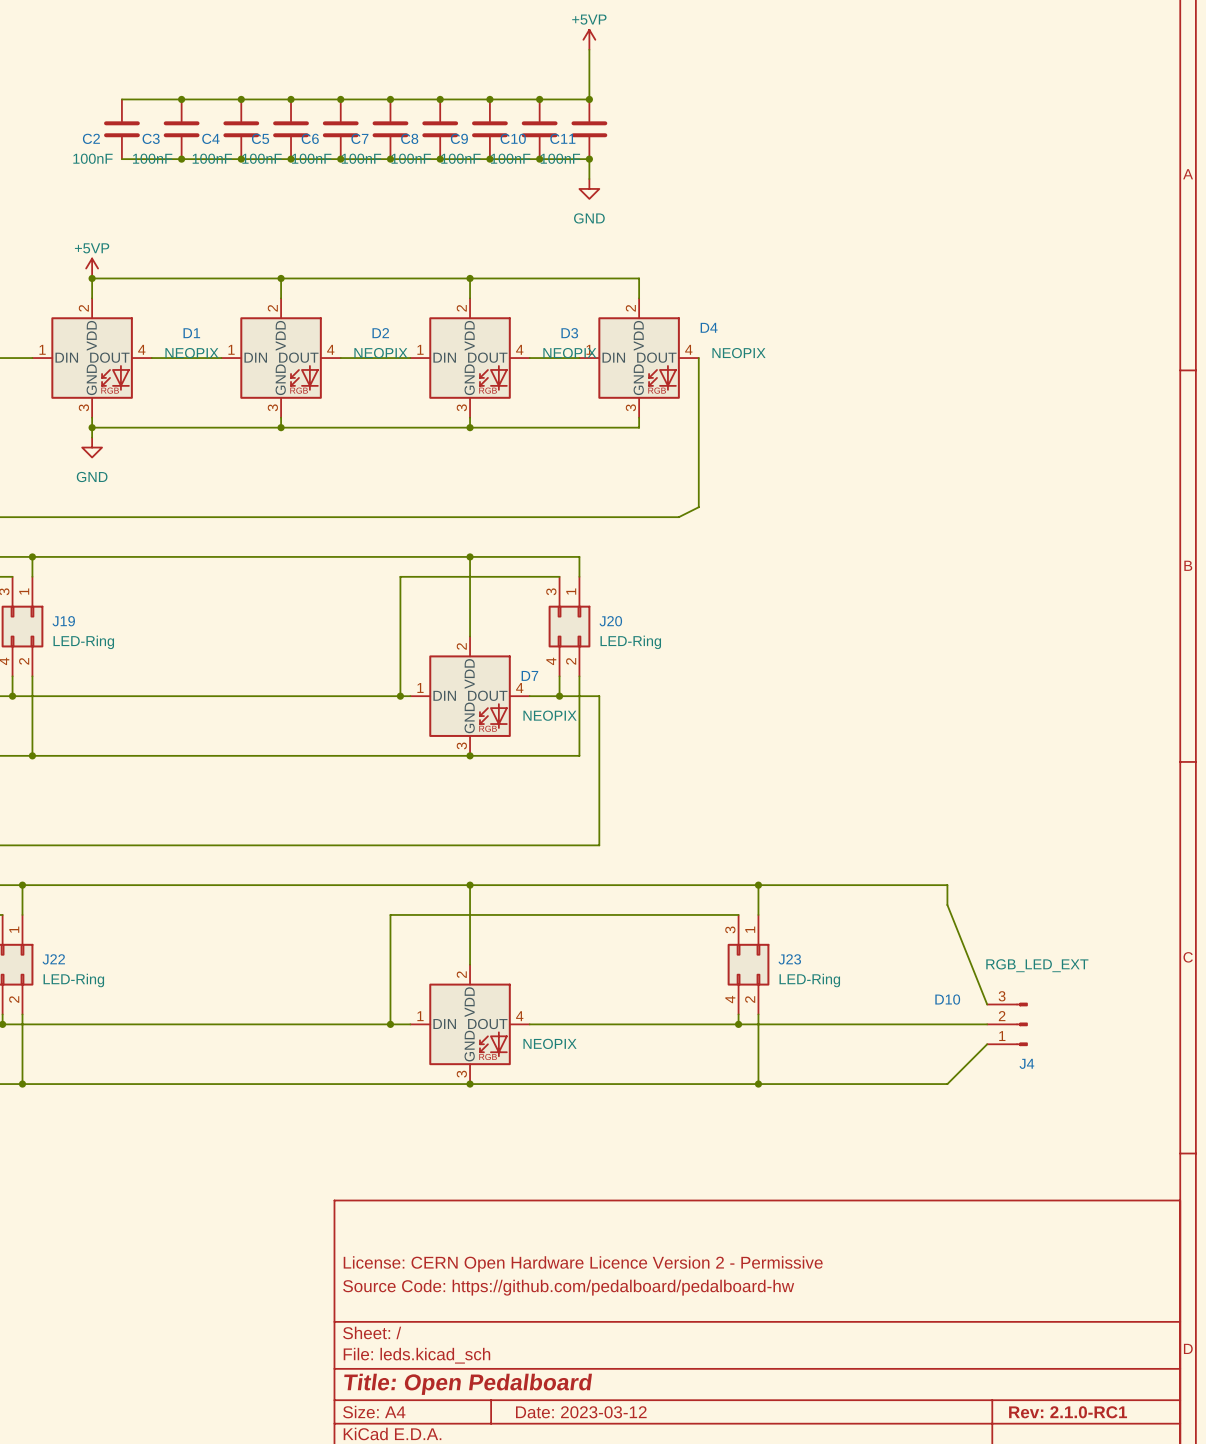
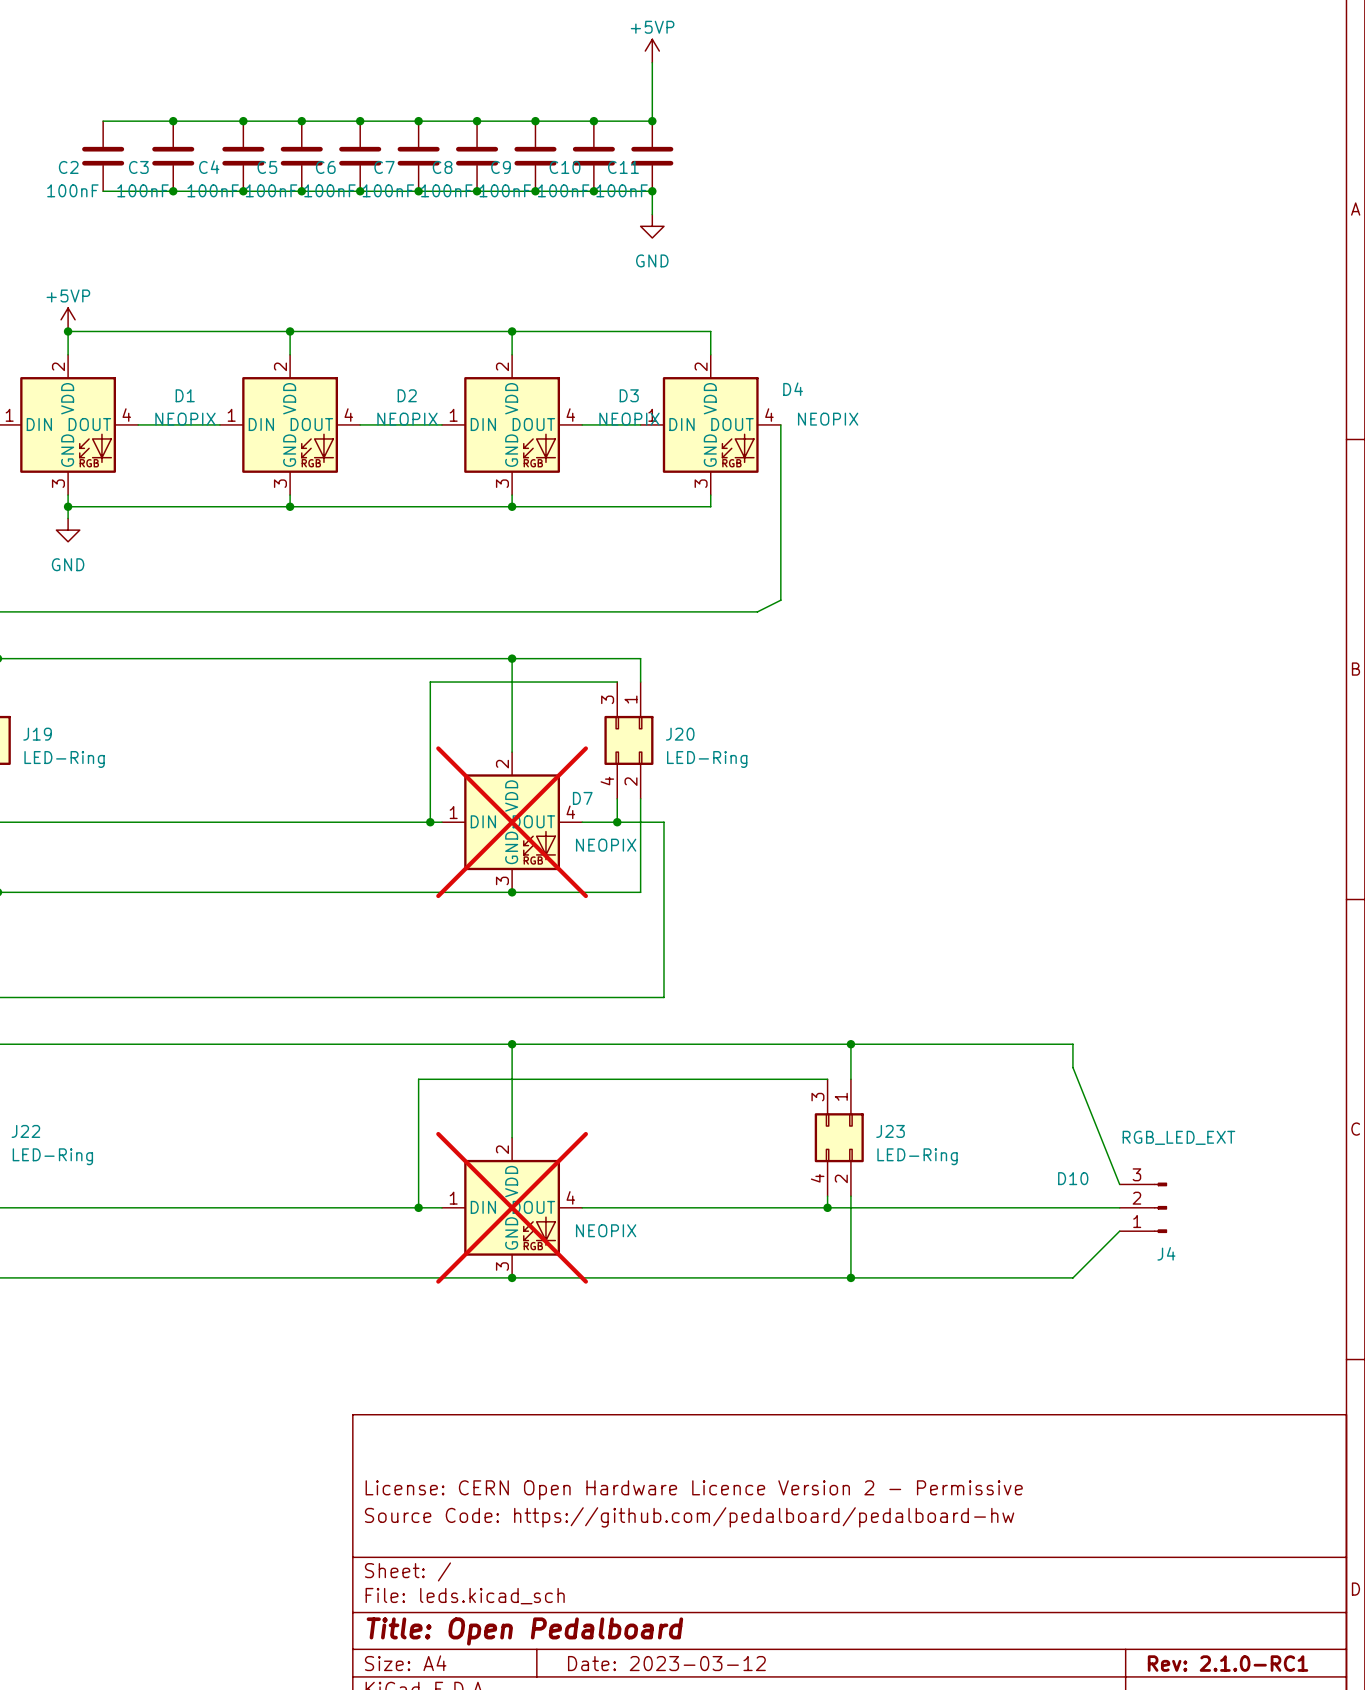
D7 do-not-place cross: none -> (512, 822)
D10 do-not-place cross: none -> (512, 1207)

